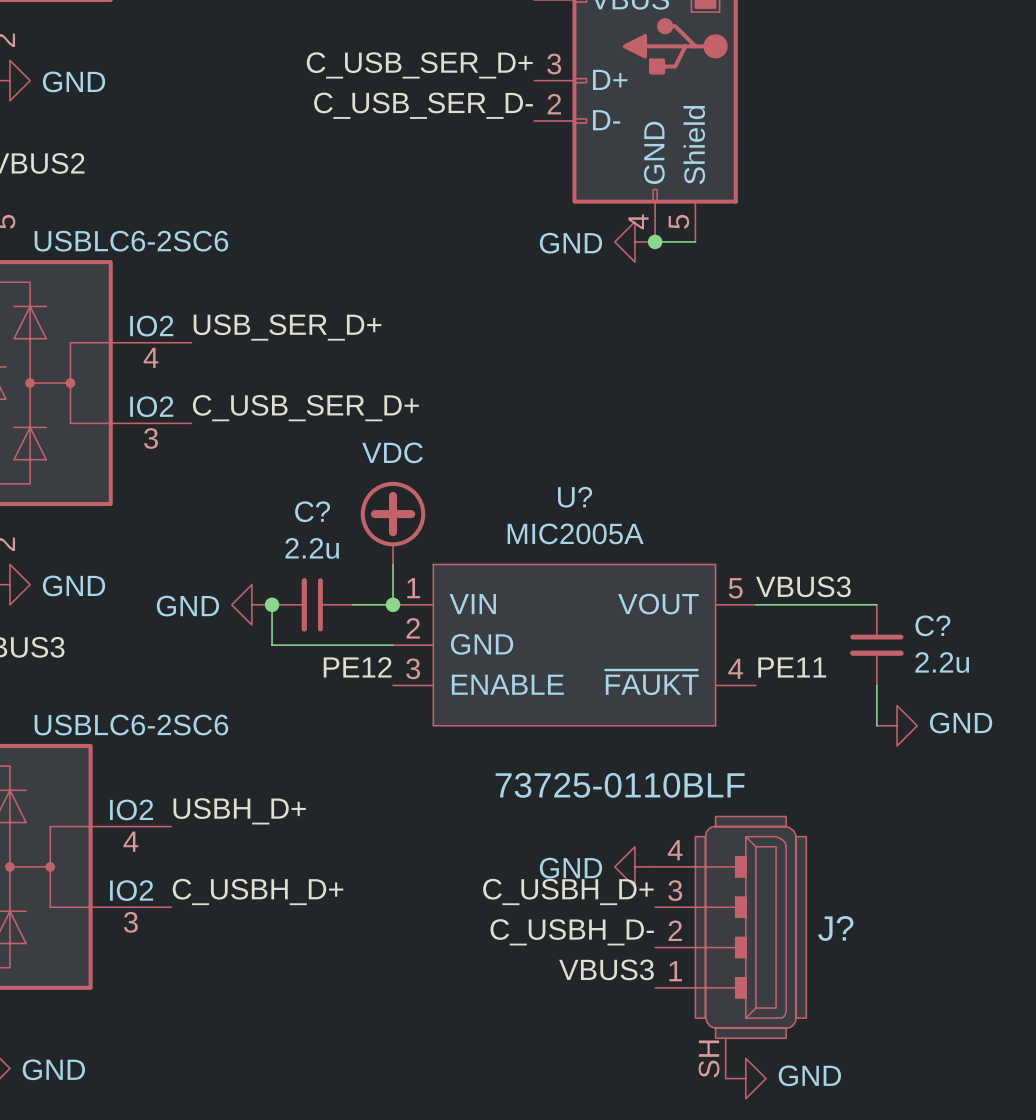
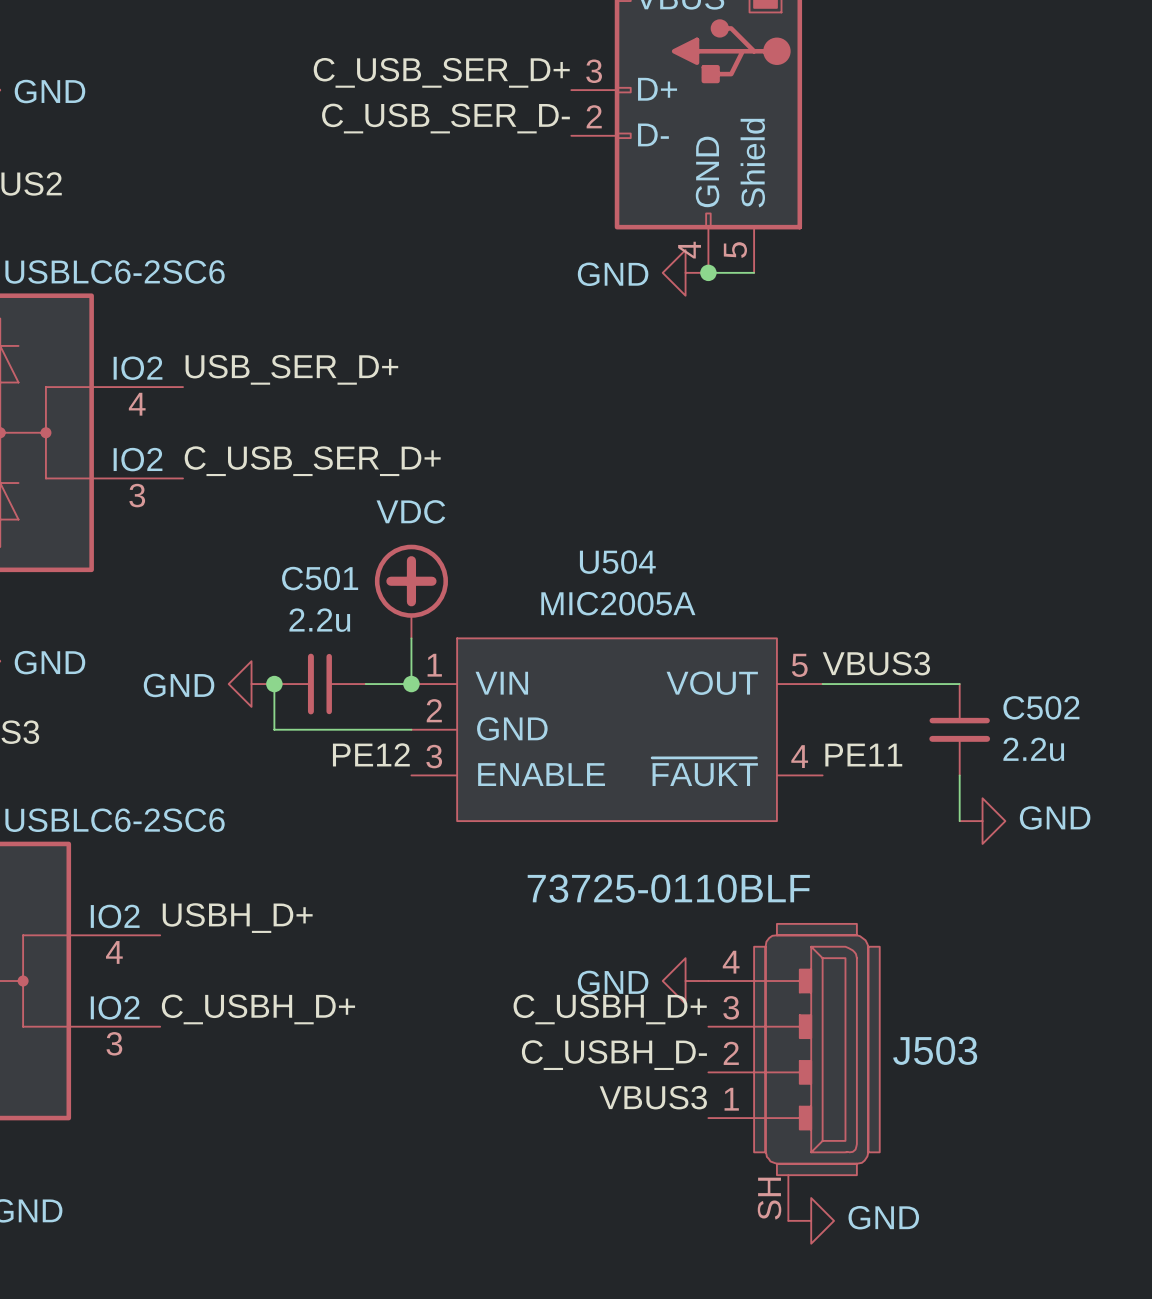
U? name: U? (575, 497) -> U504 (617, 562)
C? name: C? (312, 511) -> C501 (320, 578)
C? name: C? (932, 625) -> C502 (1041, 707)
J? name: J? (835, 928) -> J503 (935, 1050)

